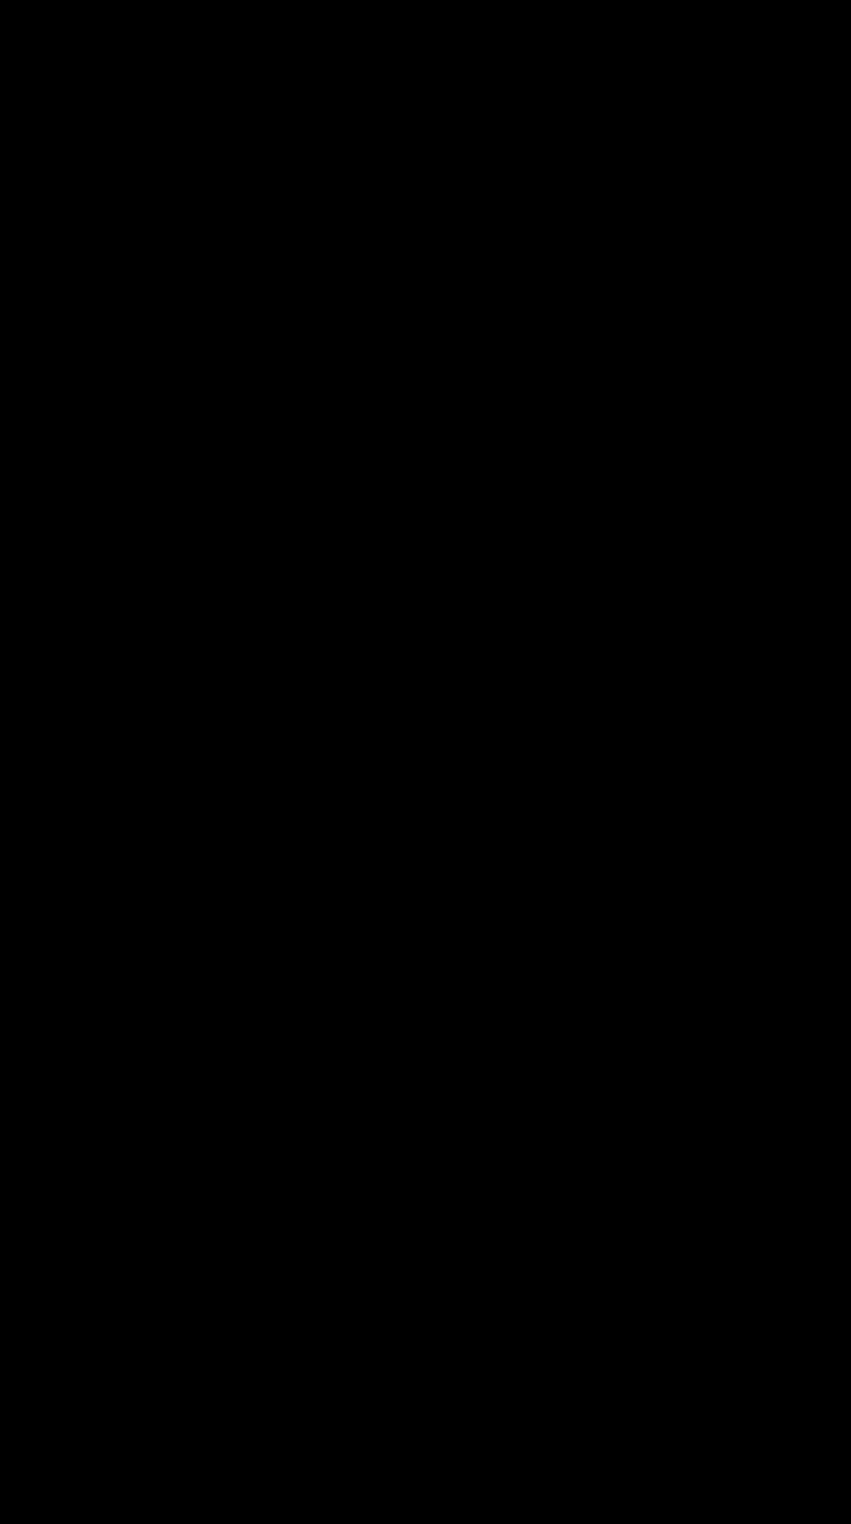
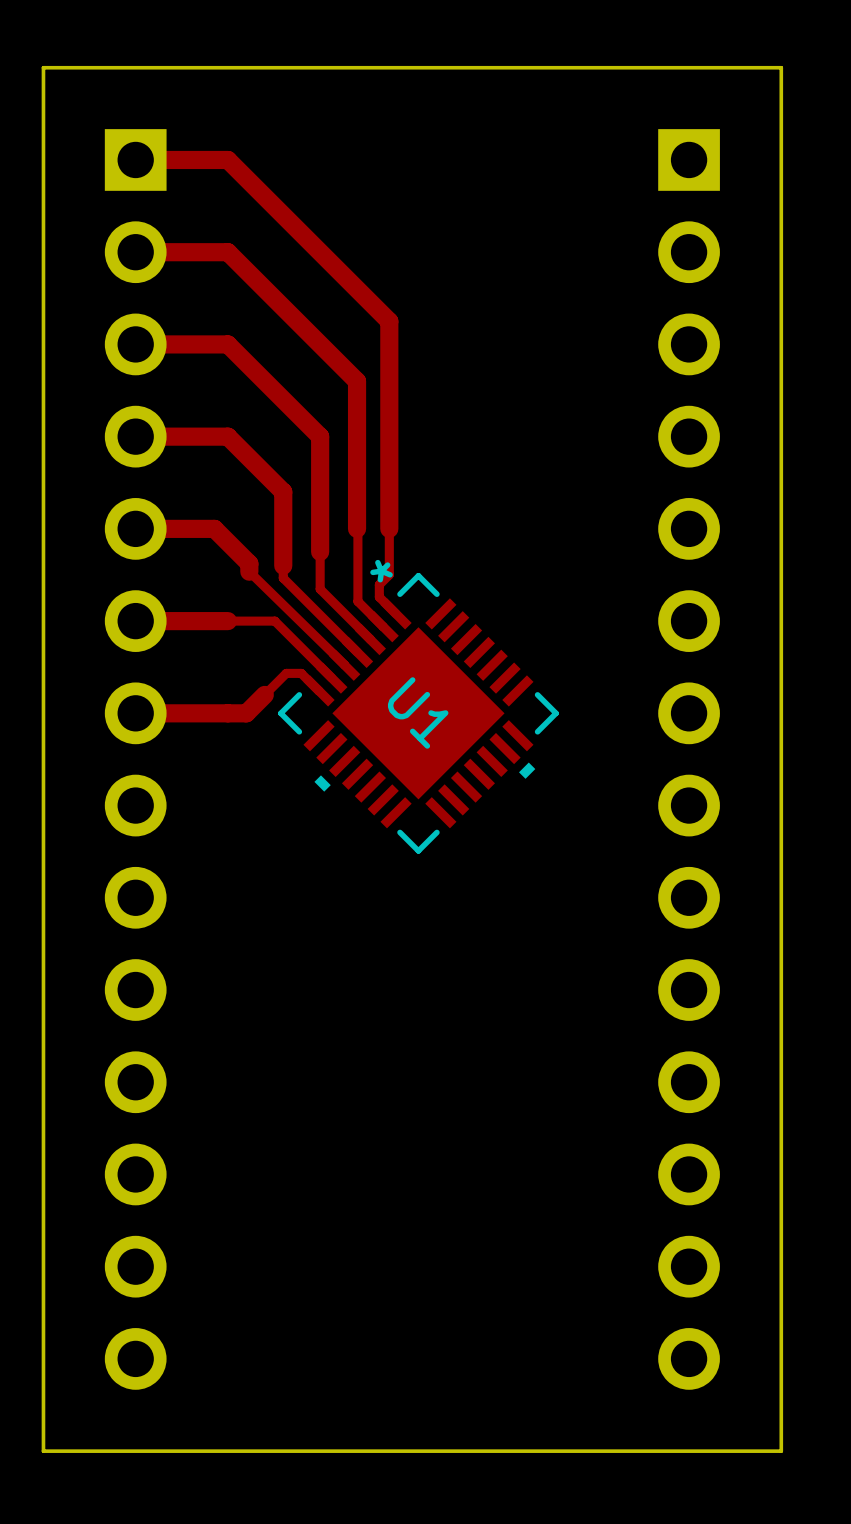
board edge: none -> (43, 67) (781, 67) (781, 1451) (43, 1451) (43, 67)
top track: none -> (135, 159) (227, 159) (389, 321) (389, 574) (379, 584) (379, 597) (396, 613)
top track: none -> (135, 252) (227, 252) (357, 381) (357, 601) (383, 626)
top track: none -> (135, 344) (227, 344) (320, 436) (320, 589) (370, 639)
top track: none -> (135, 436) (227, 436) (283, 491) (283, 578) (357, 652)
top track: none -> (135, 528) (214, 528) (249, 563) (249, 571) (344, 664)
top track: none -> (135, 621) (274, 621) (331, 678)
top track: none -> (318, 690) (301, 673) (286, 673) (246, 713) (135, 713)
U1: none -> (418, 713)
part: none -> (135, 759)
part: none -> (689, 759)

